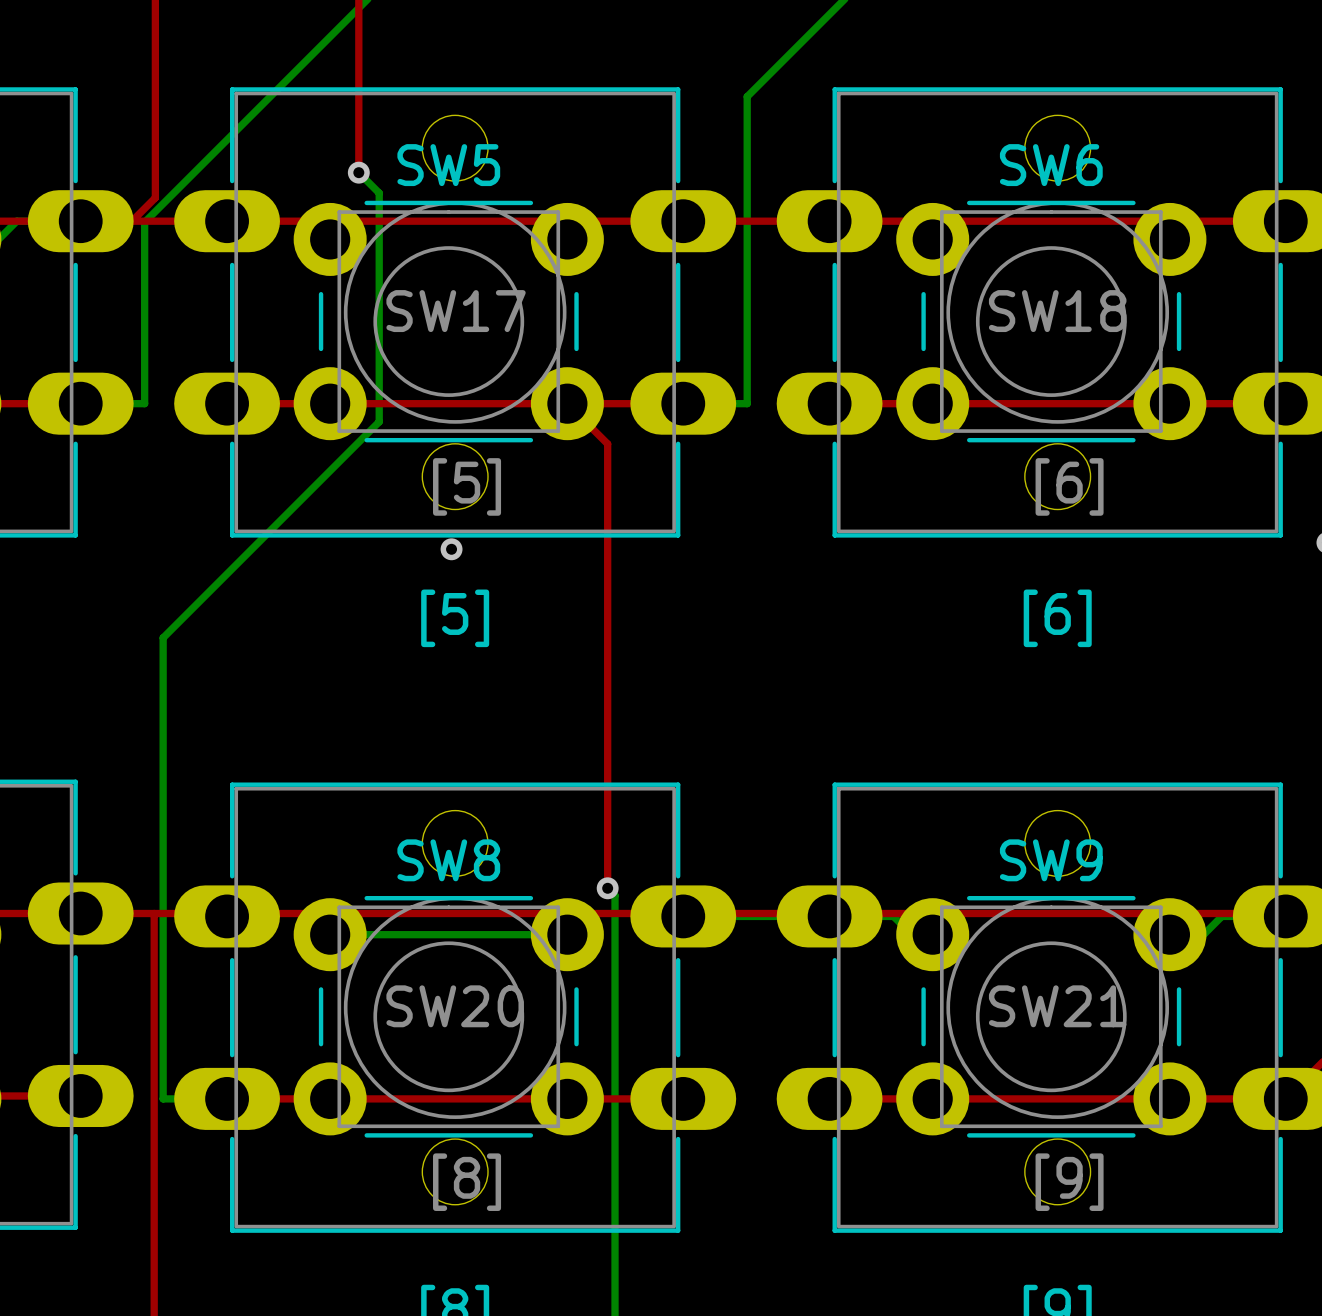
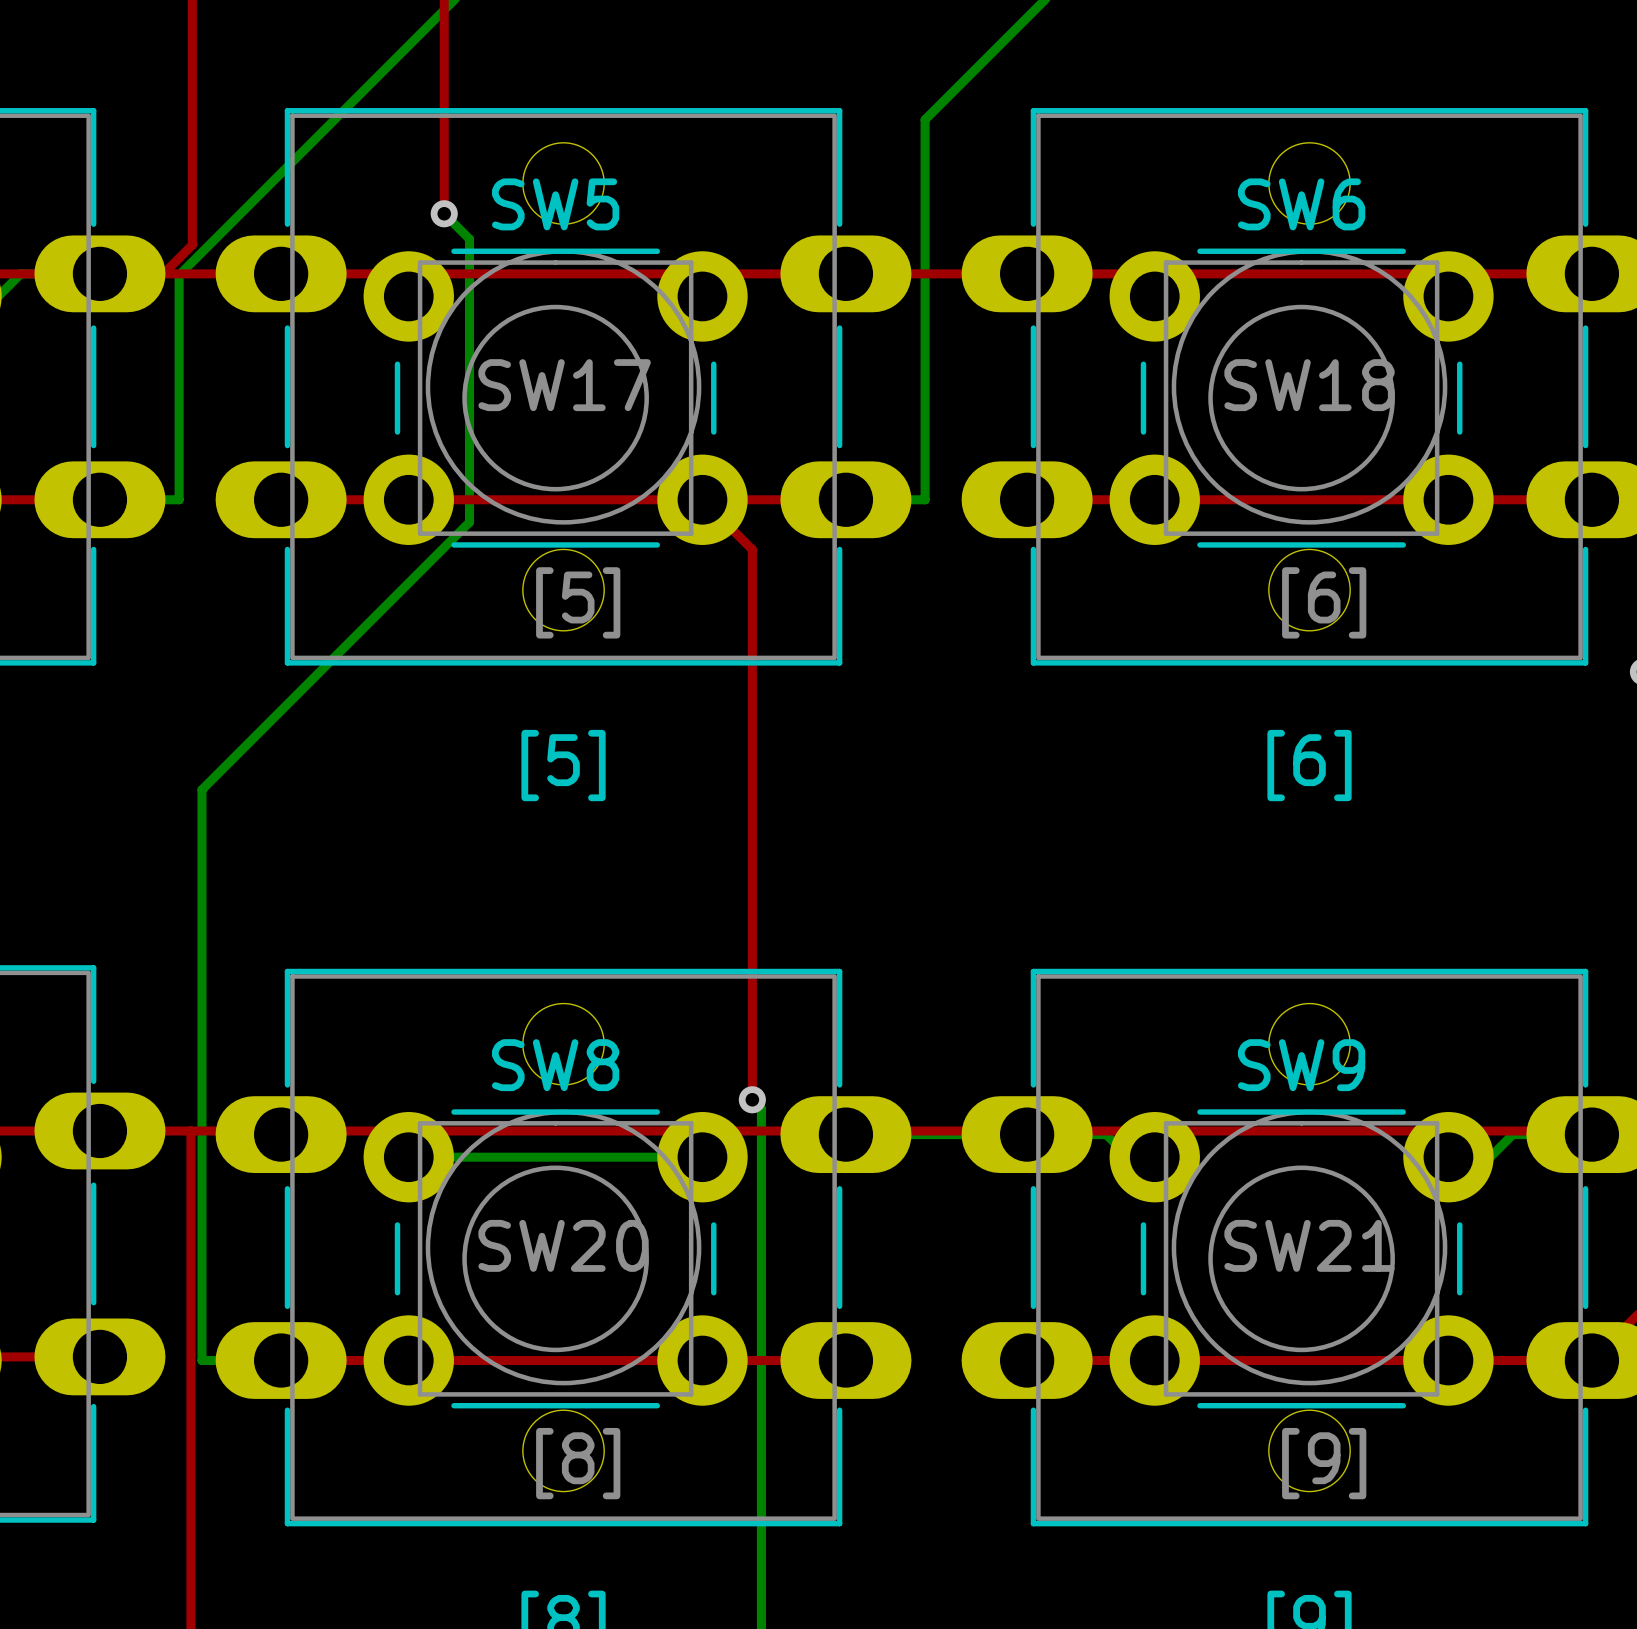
via: (451, 549) -> none

